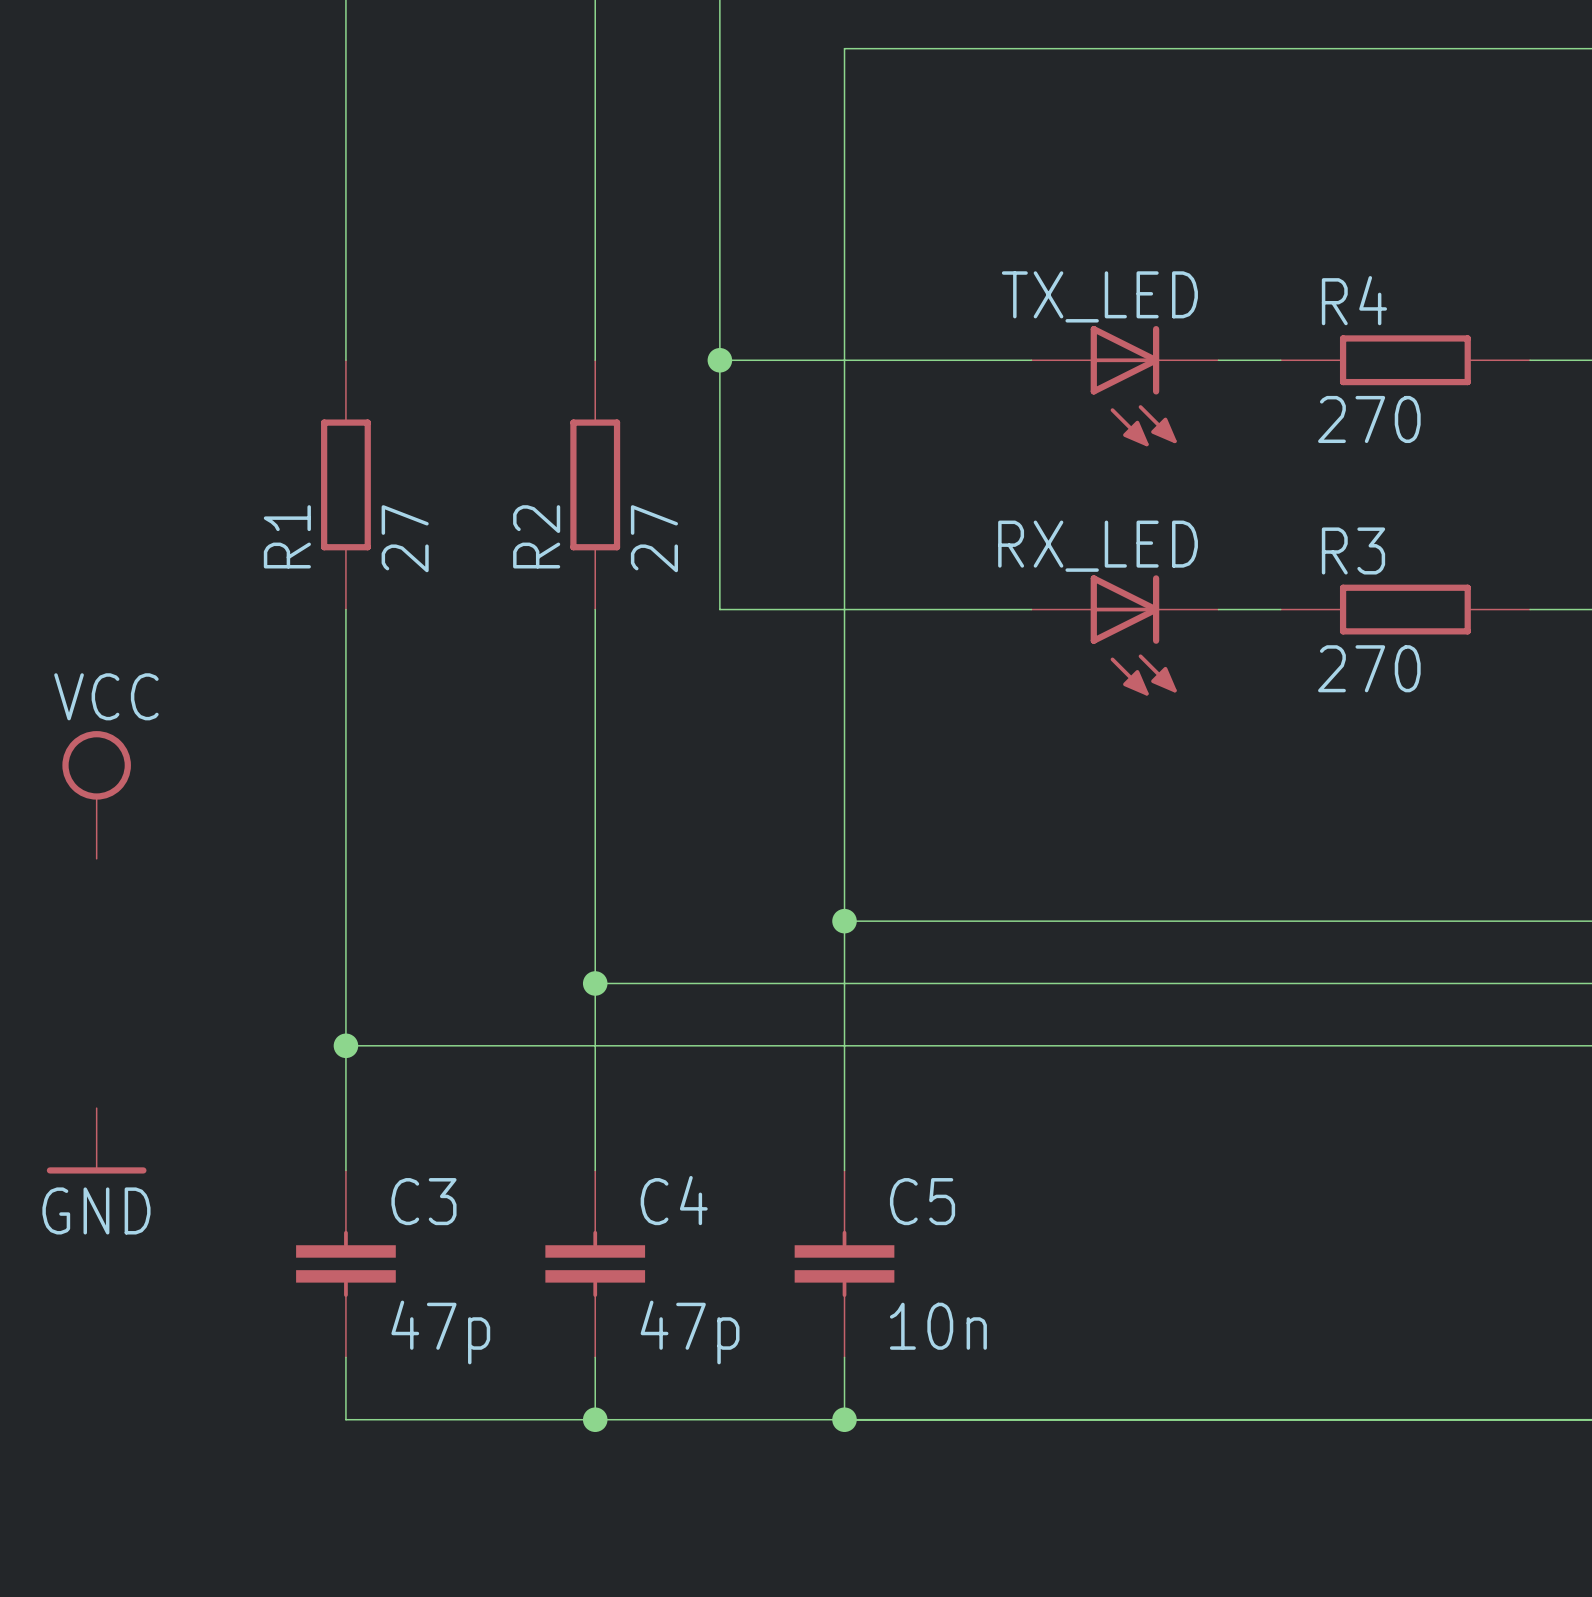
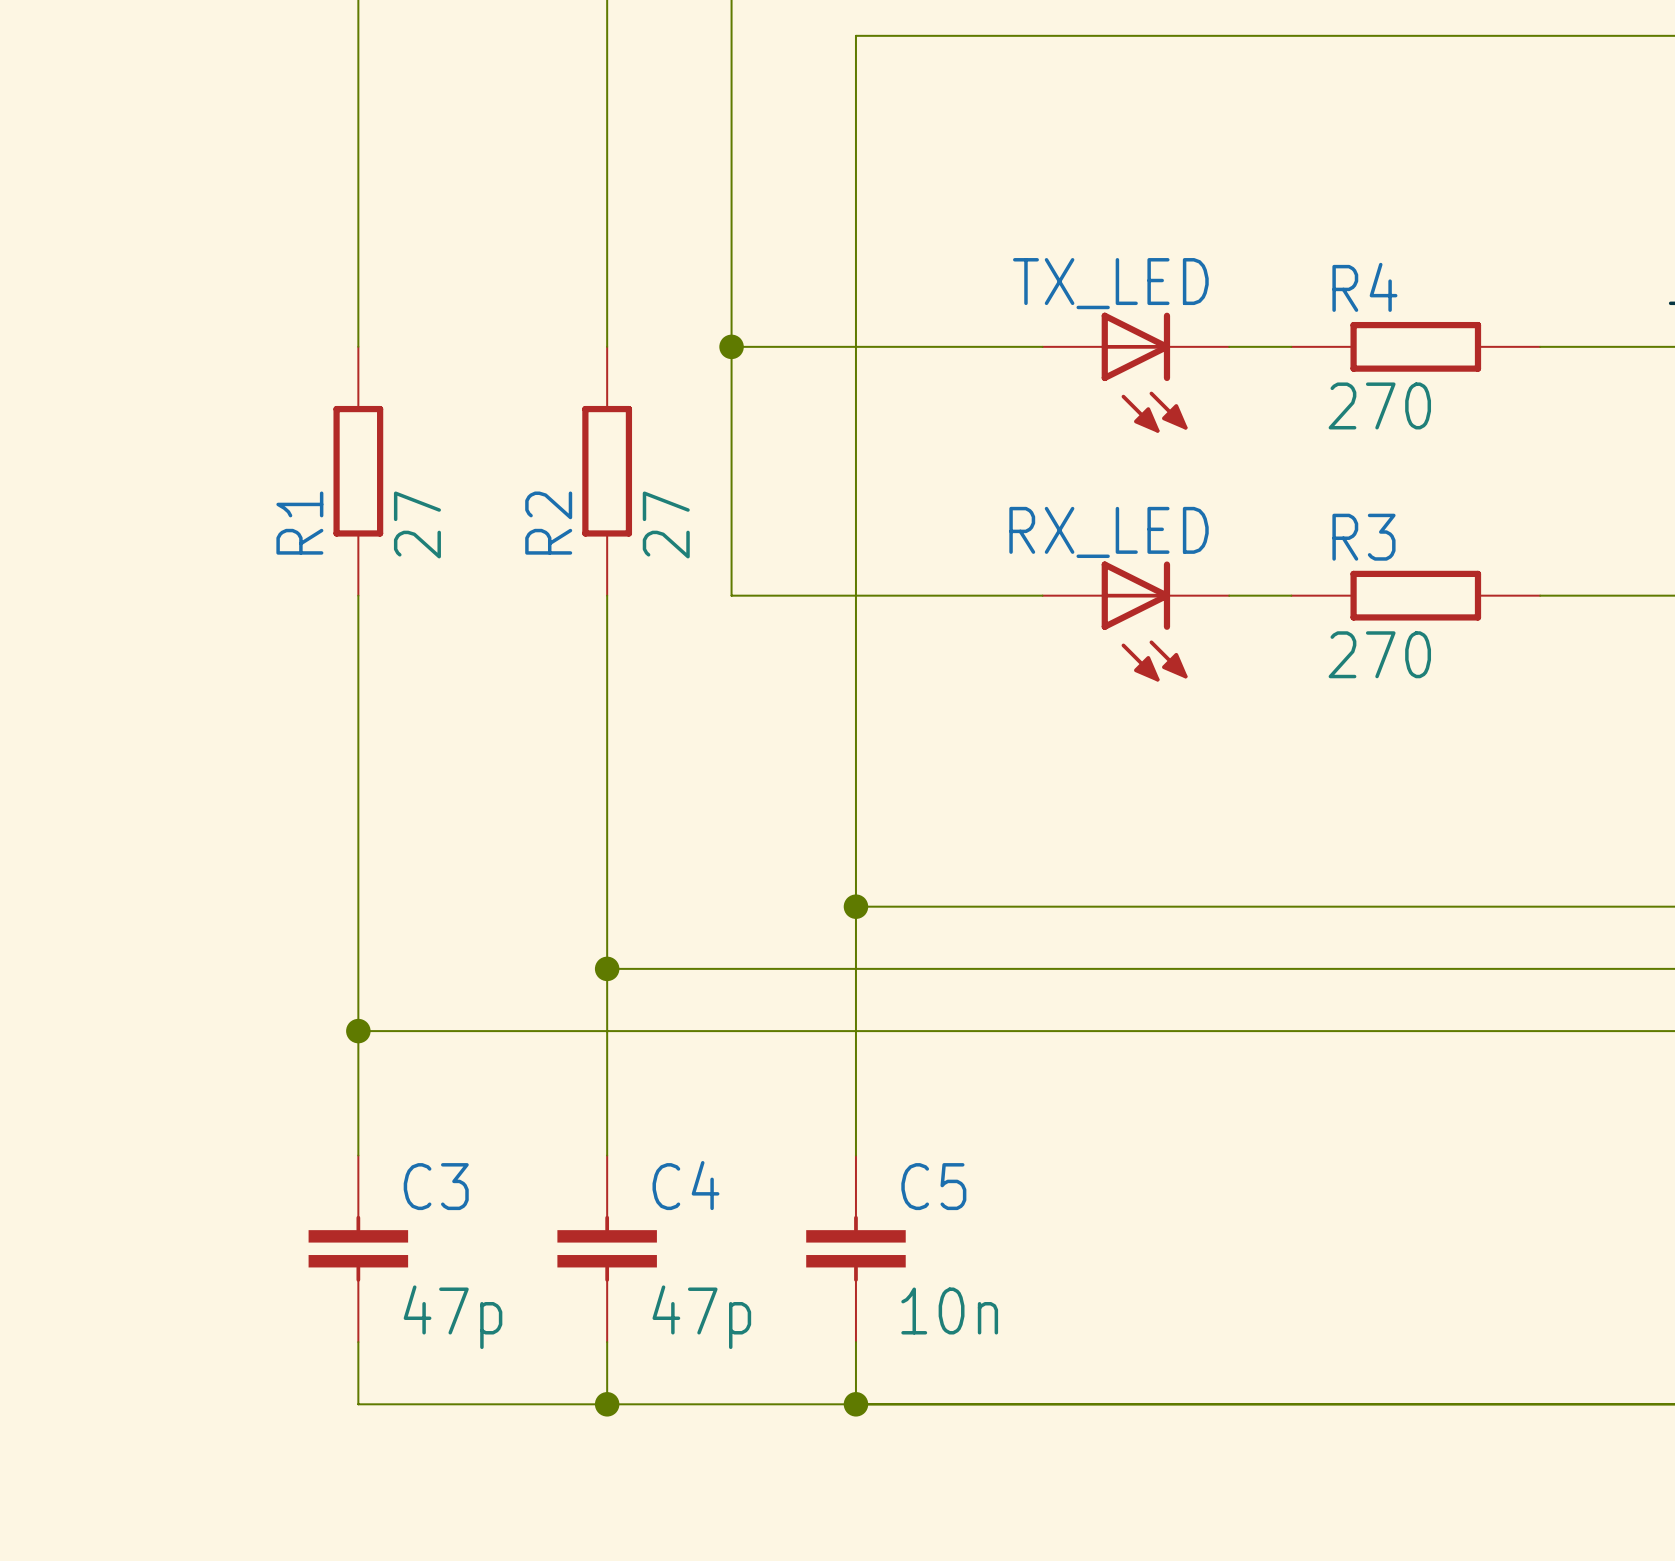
power symbol: VCC (96, 794) -> none
power symbol: GND (96, 1140) -> none

